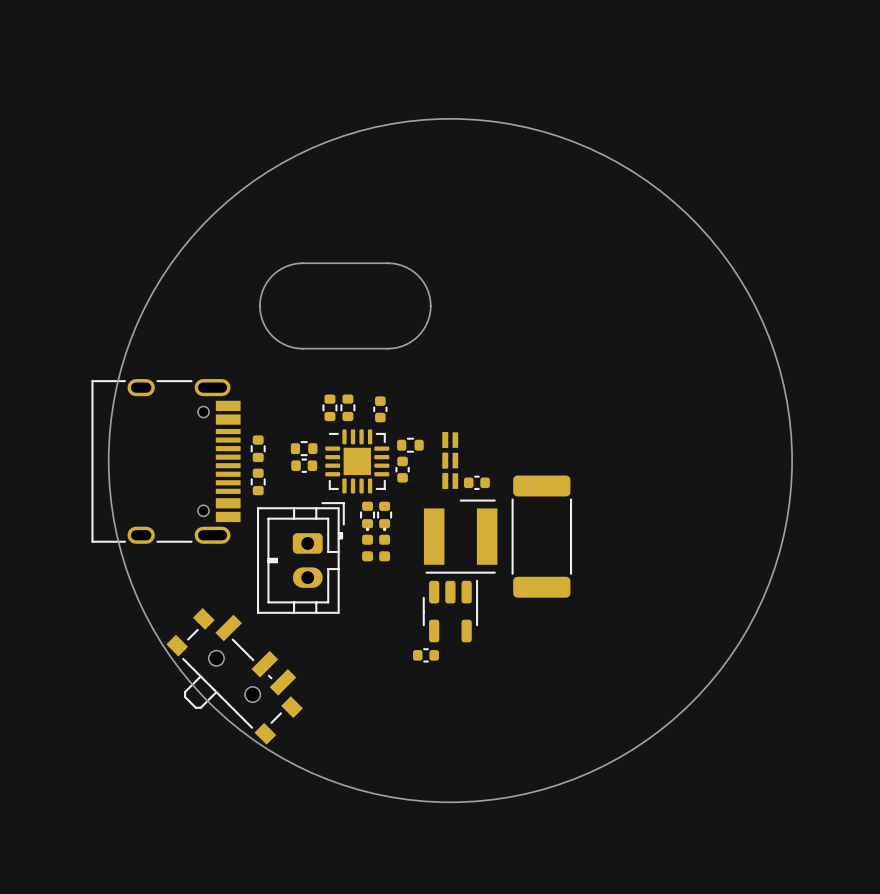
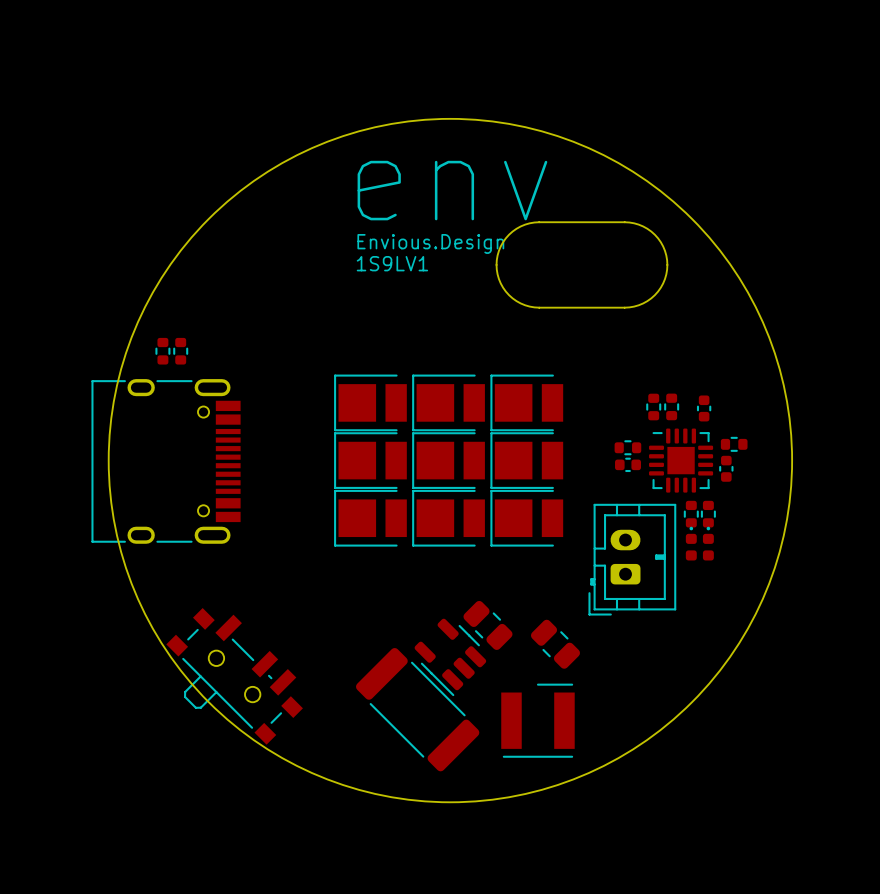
text: none -> env (452, 190)
text: none -> Envious.Design (430, 243)
board edge: (302, 263) (388, 263) (406, 267) (418, 275) (428, 291) (430, 310) (426, 324) (414, 339) (406, 344) (392, 348) (302, 348) (284, 344) (272, 336) (264, 324) (260, 310) (260, 296) (266, 283) (275, 272) (288, 265) (302, 263) -> (539, 222) (624, 222) (643, 226) (658, 238) (664, 250) (667, 269) (663, 283) (658, 291) (647, 301) (629, 307) (539, 307) (520, 303) (509, 295) (500, 283) (496, 269) (497, 255) (503, 242) (512, 231) (525, 224) (539, 222)
text: none -> 1S9LV1 (392, 263)
part: none -> (162, 351)
part: none -> (180, 351)
part: none -> (370, 402)
part: none -> (448, 402)
part: none -> (526, 402)
part: none -> (671, 406)
part: (329, 407) -> none
part: (347, 407) -> none
part: none -> (653, 407)
part: none -> (704, 408)
part: (380, 409) -> none
part footprint: [325, 429, 390, 494] -> [334, 432, 407, 489]
part: (450, 440) -> none
part: none -> (734, 444)
part: (410, 445) -> none
part: none -> (627, 447)
part: (258, 448) -> none
part: (304, 448) -> none
part footprint: [442, 452, 459, 469] -> [412, 432, 485, 489]
part: none -> (526, 460)
part: none -> (681, 460)
part: none -> (628, 464)
part: (304, 465) -> none
part: none -> (726, 468)
part: (402, 469) -> none
part: (258, 481) -> none
part: (450, 481) -> none
part: (476, 482) -> none
part footprint: [360, 501, 376, 529] -> [334, 489, 407, 547]
part: (384, 514) -> none
part: none -> (691, 514)
part: none -> (708, 514)
part: none -> (448, 518)
part: none -> (526, 518)
part position: (460, 536) -> (537, 720)
part: (541, 536) -> none
part: none -> (691, 543)
part: none -> (708, 543)
part: (367, 544) -> none
part: (384, 544) -> none
part rotation: 0° (300, 557) -> 180° (632, 559)
part position: (300, 557) -> (632, 559)
part: (450, 611) -> none
part: none -> (487, 625)
part: none -> (555, 644)
part: (425, 655) -> none
part: none -> (450, 657)
part: none -> (417, 709)

